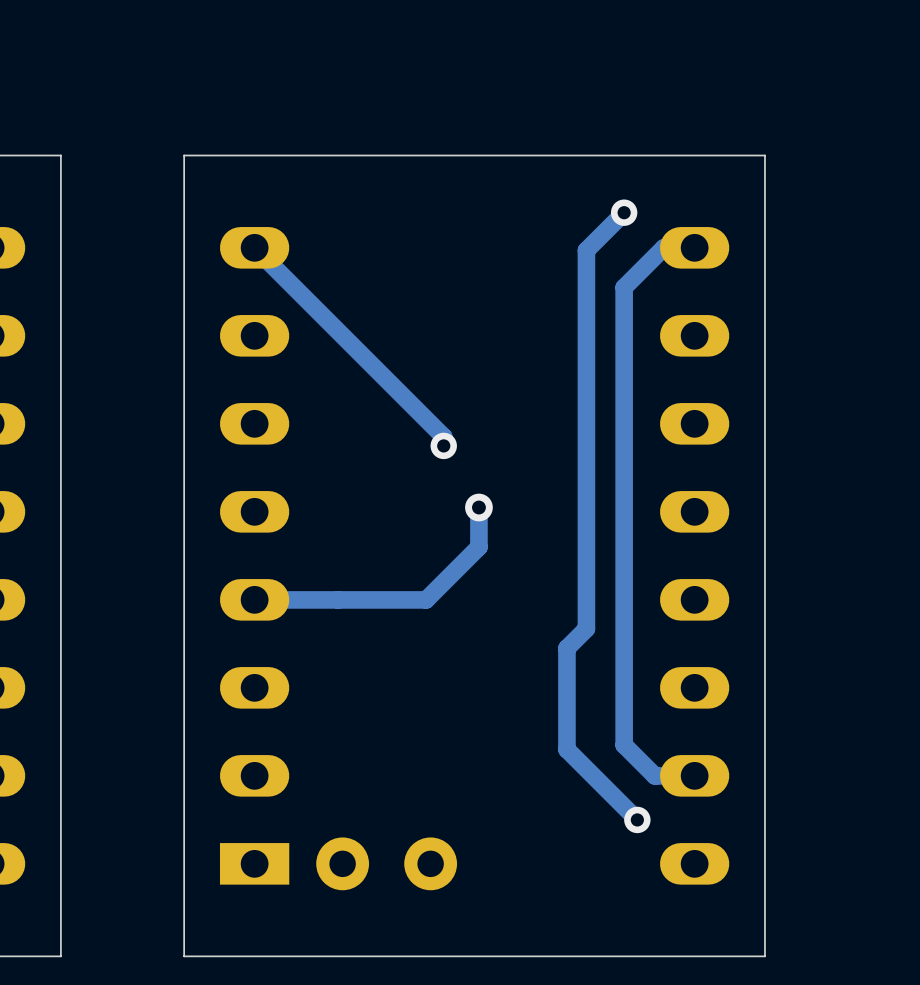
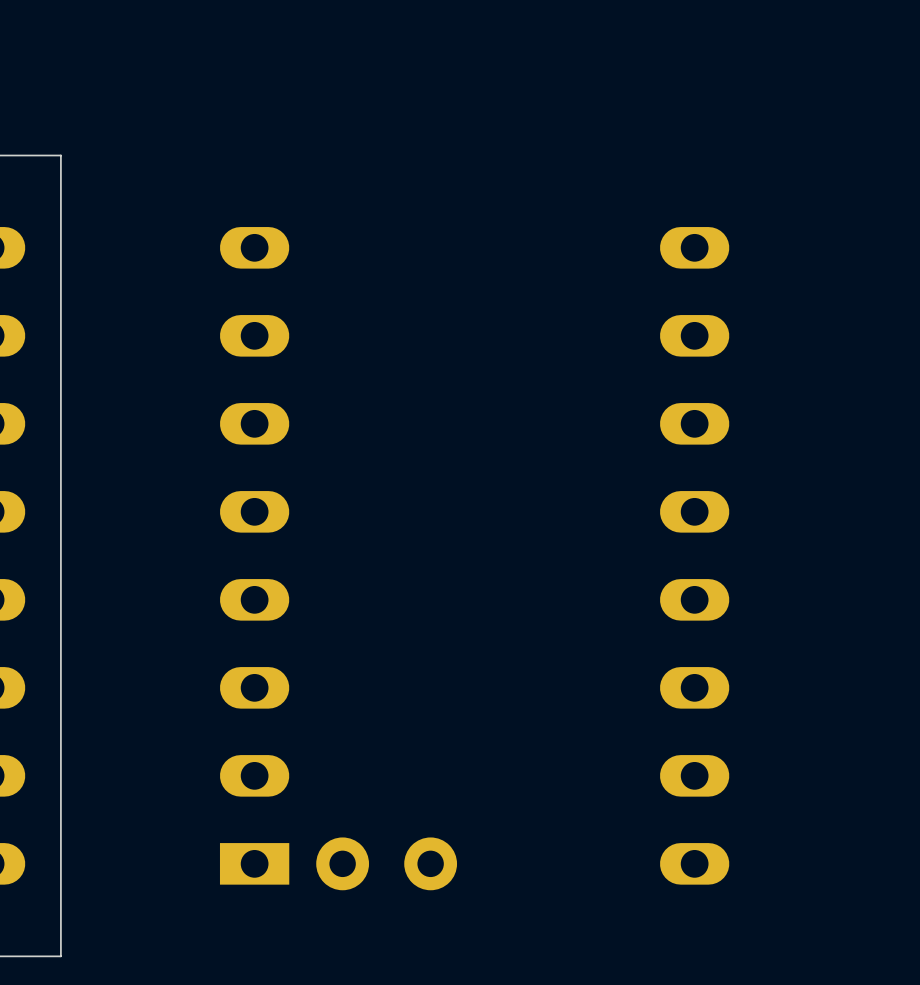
board edge: (764, 155) (184, 155) (184, 956) (764, 956) (764, 155) -> none
track: (624, 212) (586, 250) (586, 628) (566, 648) (566, 749) (637, 819) -> none
via: (624, 212) -> none
track: (254, 247) (443, 436) (443, 445) -> none
track: (694, 247) (663, 247) (624, 287) (624, 745) (654, 775) (694, 775) -> none
via: (443, 445) -> none
track: (478, 507) (478, 547) (426, 599) (254, 599) -> none
via: (478, 507) -> none
via: (637, 819) -> none

